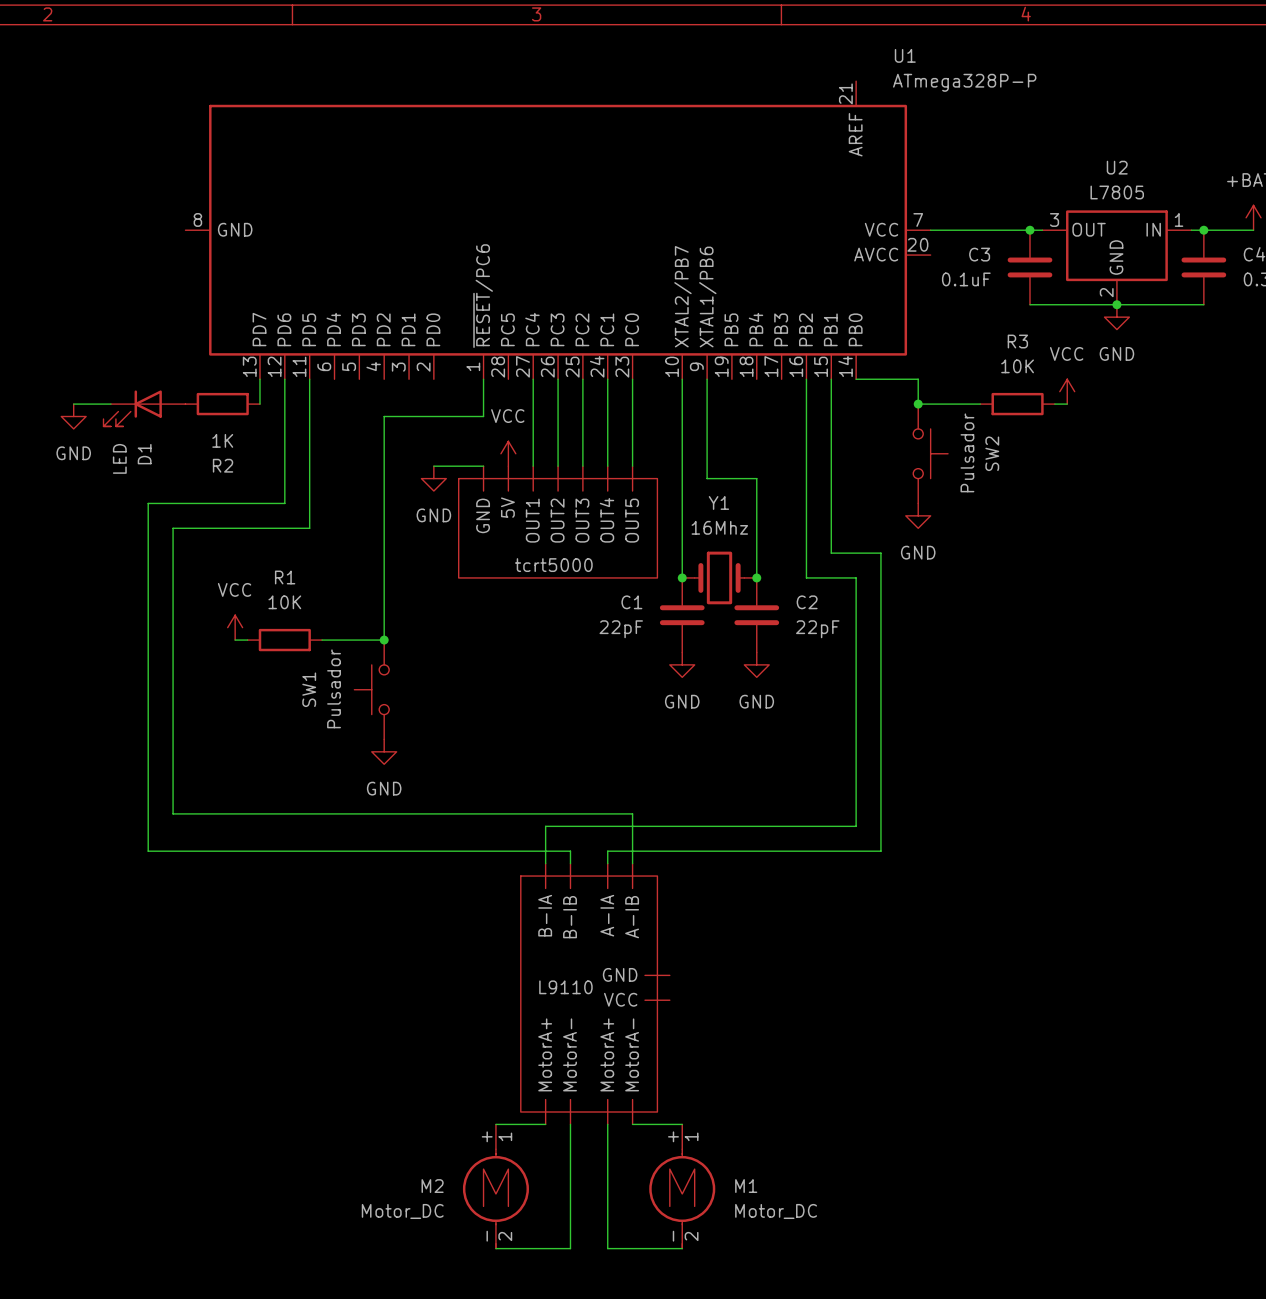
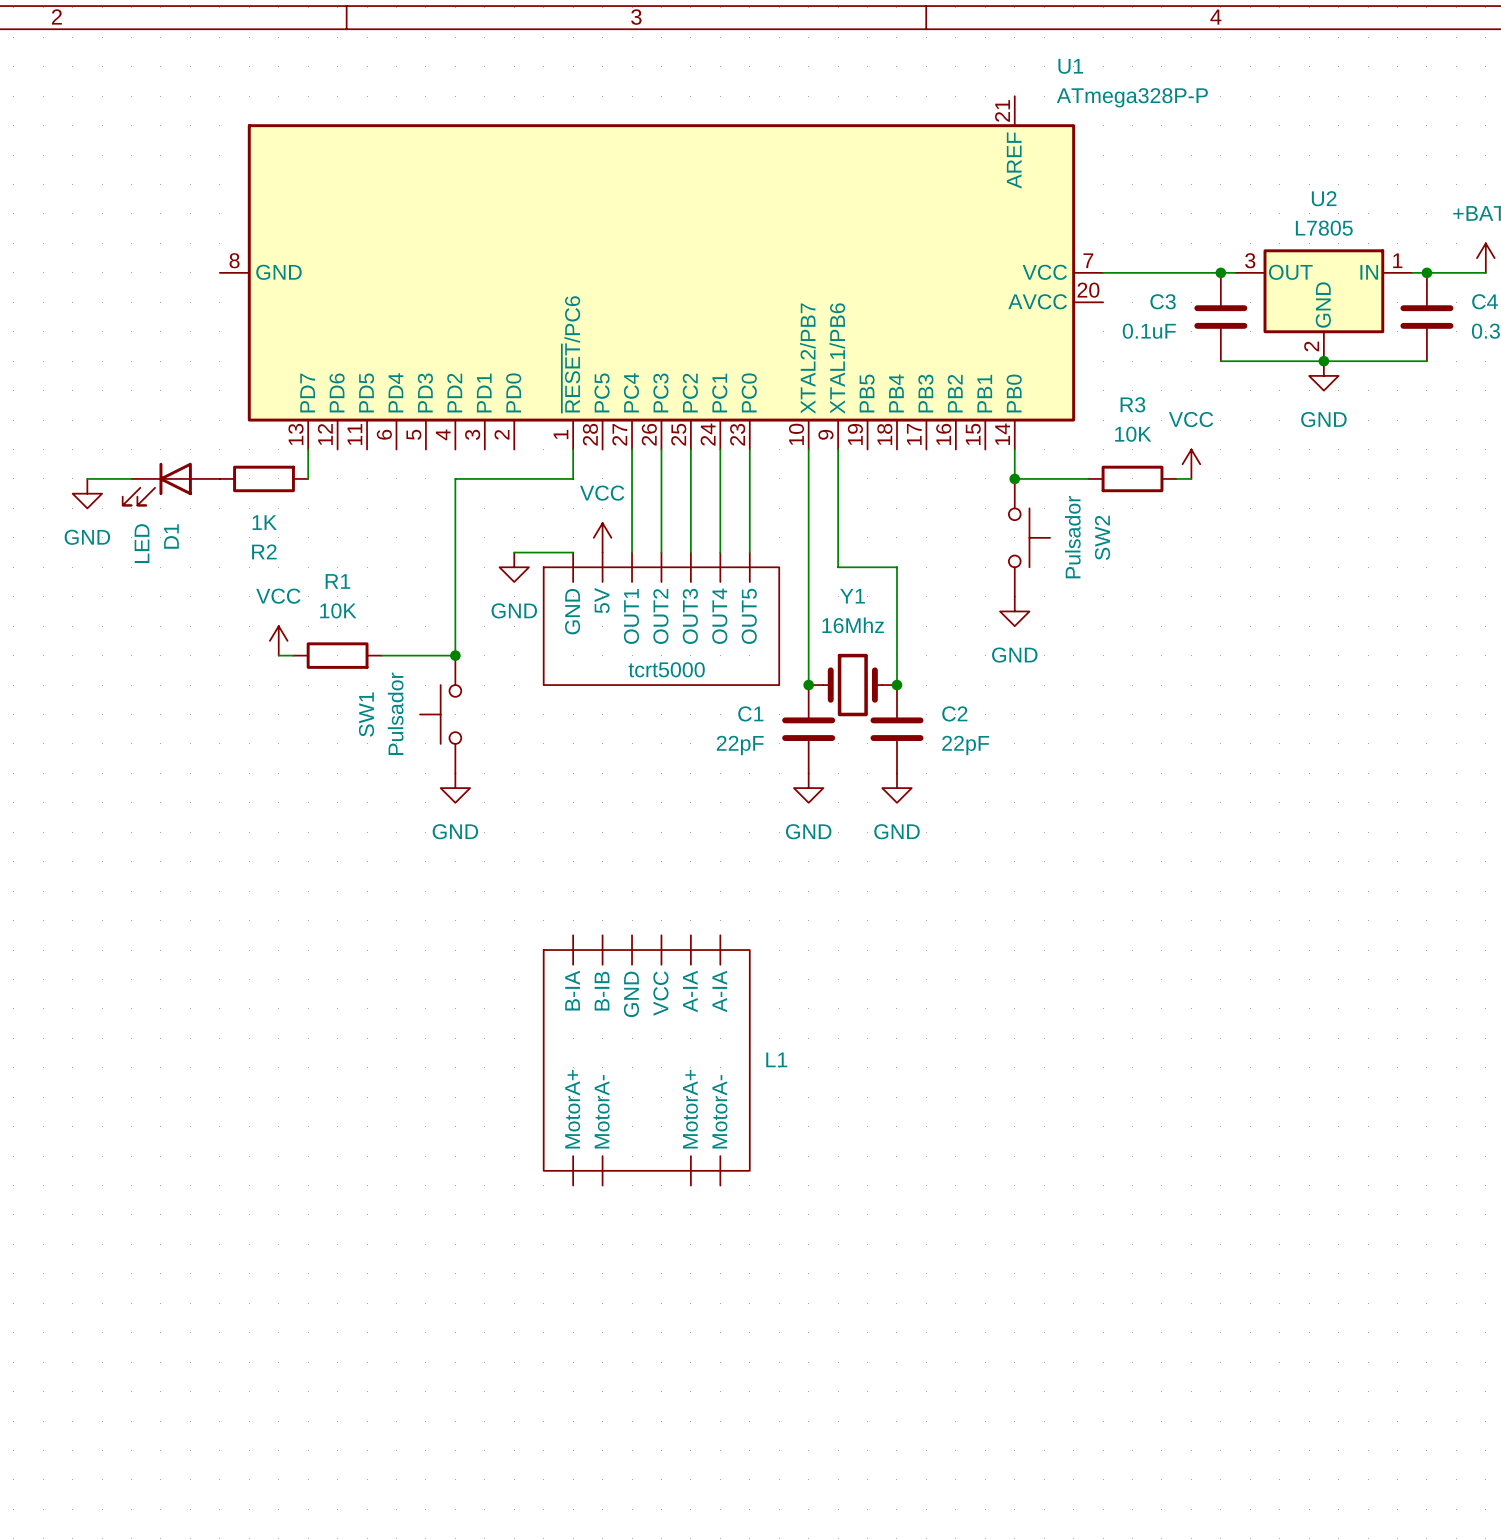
wire: (284, 379) (284, 503) (148, 503) (148, 851) (570, 851) (570, 863) -> none
wire: (309, 379) (309, 528) (173, 528) (173, 813) (632, 813) (632, 863) -> none
wire: (806, 379) (806, 577) (856, 577) (856, 826) (545, 826) (545, 863) -> none
wire: (831, 379) (831, 553) (880, 553) (880, 851) (607, 851) (607, 863) -> none
wire: (856, 379) (918, 379) (918, 404) (980, 404) -> (1014, 449) (1014, 478) (1088, 478)
power symbol position: VCC (1067, 391) -> VCC (1191, 464)
wire: (483, 404) (483, 416) (384, 416) -> (573, 478) (455, 478) (455, 493)
junction: none -> (1014, 478)
junction: (918, 404) -> none
R3 position: (1017, 404) -> (1132, 478)
wire: (1054, 404) (1067, 404) -> (1176, 478) (1191, 478)
SW2 position: (930, 453) -> (1029, 537)
power symbol position: GND (918, 515) -> GND (1014, 611)
wire: (384, 553) (384, 640) (322, 640) -> (455, 655) (381, 655)
junction: none -> (455, 655)
power symbol position: VCC (235, 627) -> VCC (278, 640)
wire: (235, 640) (247, 640) -> (278, 655) (293, 655)
R1 position: (284, 640) -> (337, 655)
junction: (384, 640) -> none
SW1 position: (371, 689) -> (440, 714)
power symbol position: GND (384, 751) -> GND (455, 788)
L1: none -> (646, 1060)
L9110: (595, 994) -> none
wire: (495, 1124) (545, 1124) -> none
wire: (570, 1124) (570, 1248) (495, 1248) -> none
wire: (607, 1124) (607, 1248) (682, 1248) -> none
wire: (632, 1124) (682, 1124) -> none
M2: Motor_DC (495, 1186) -> none
M1: Motor_DC (682, 1186) -> none

